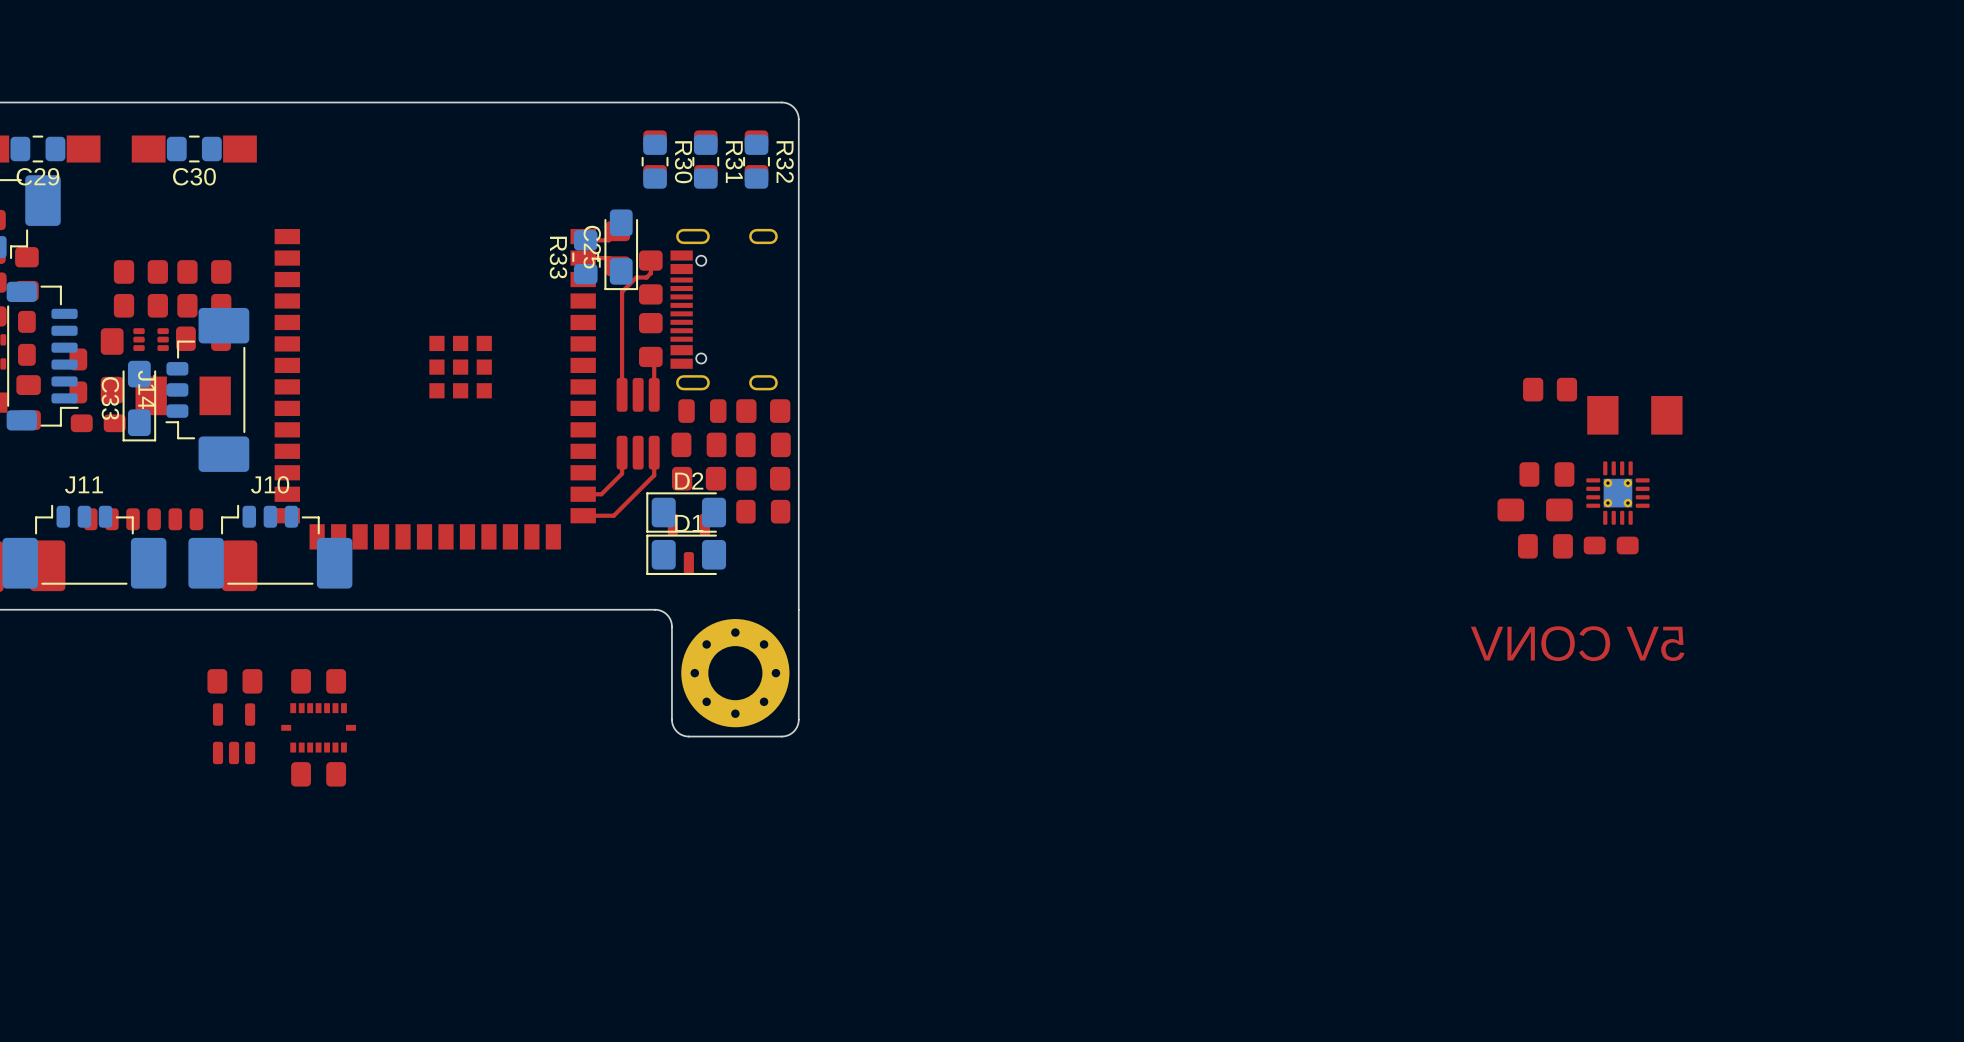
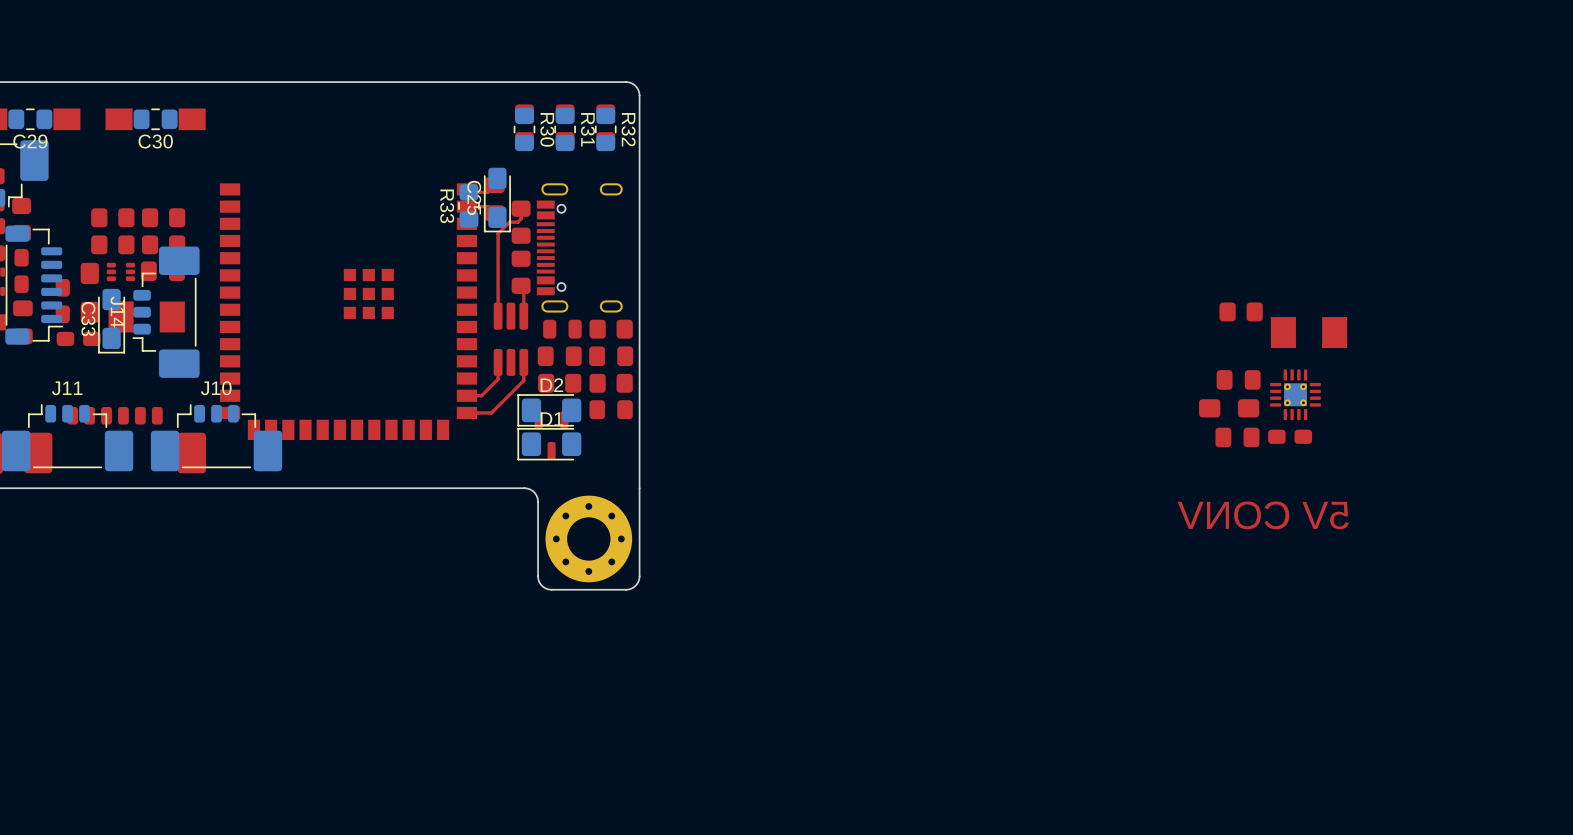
part: (234, 681) -> none
part: (318, 681) -> none
part: (318, 727) -> none
part: (234, 733) -> none
part: (318, 774) -> none

